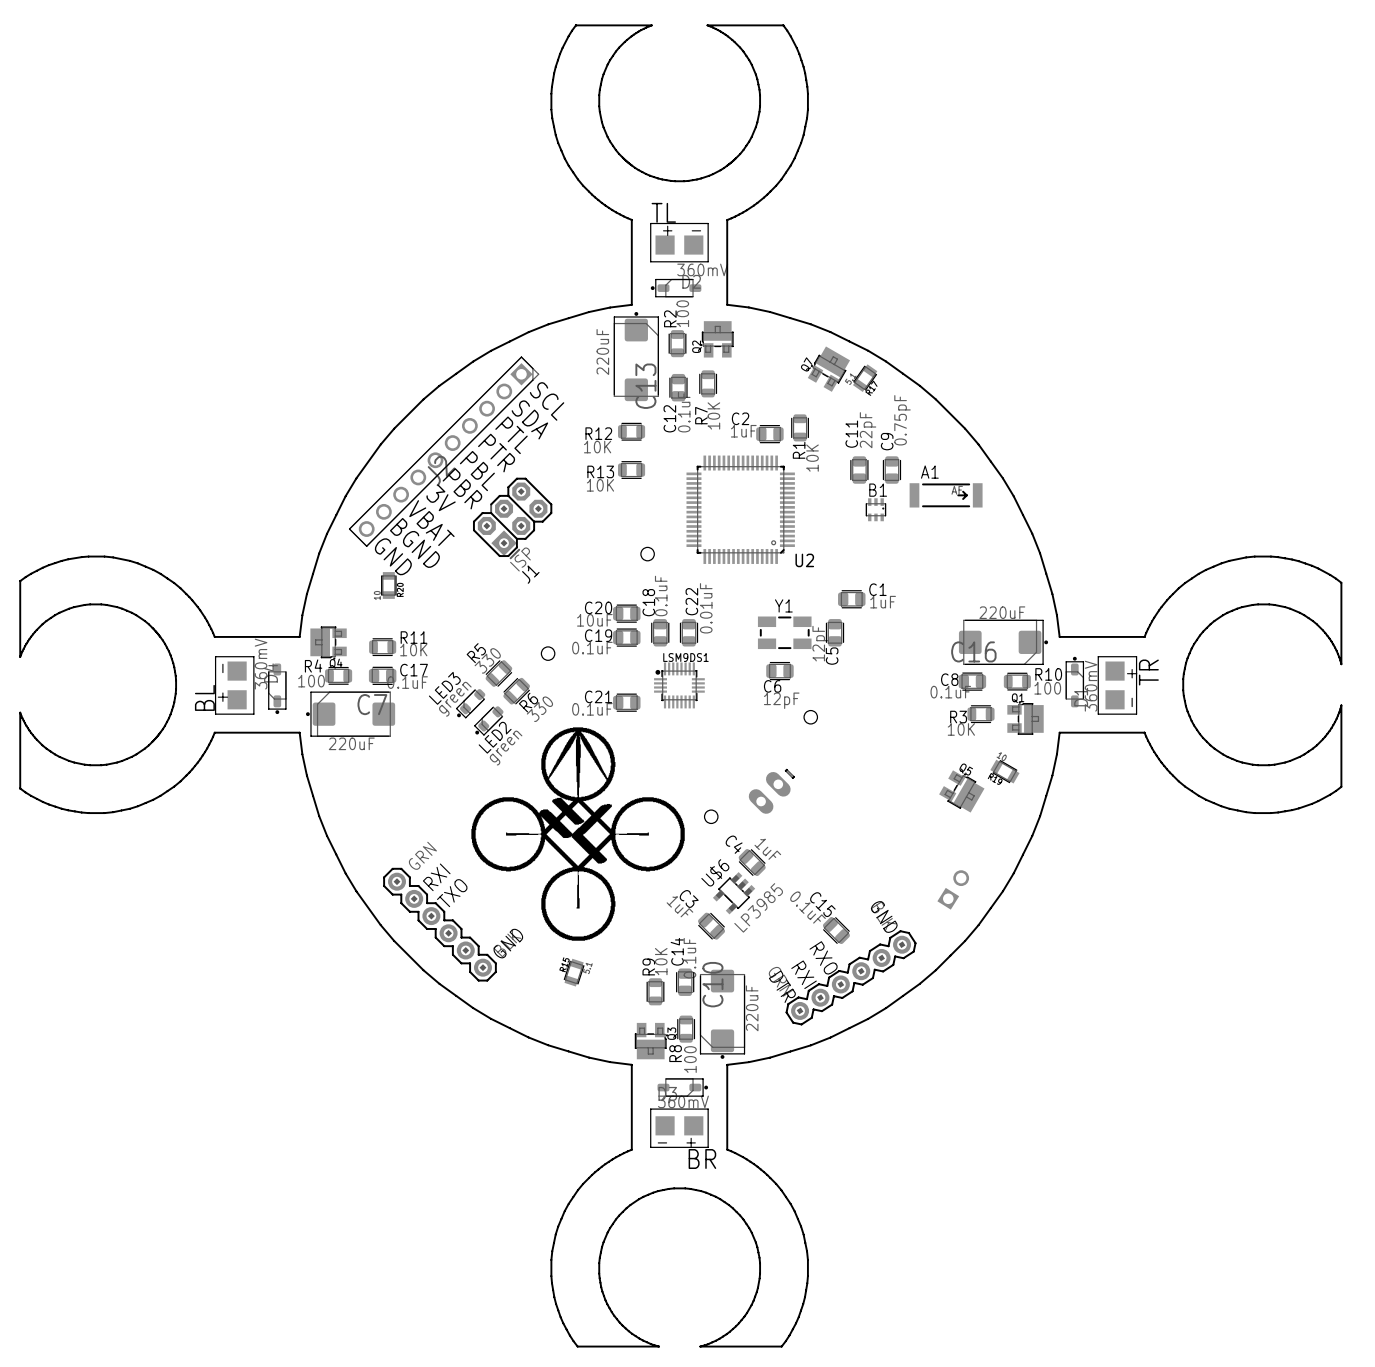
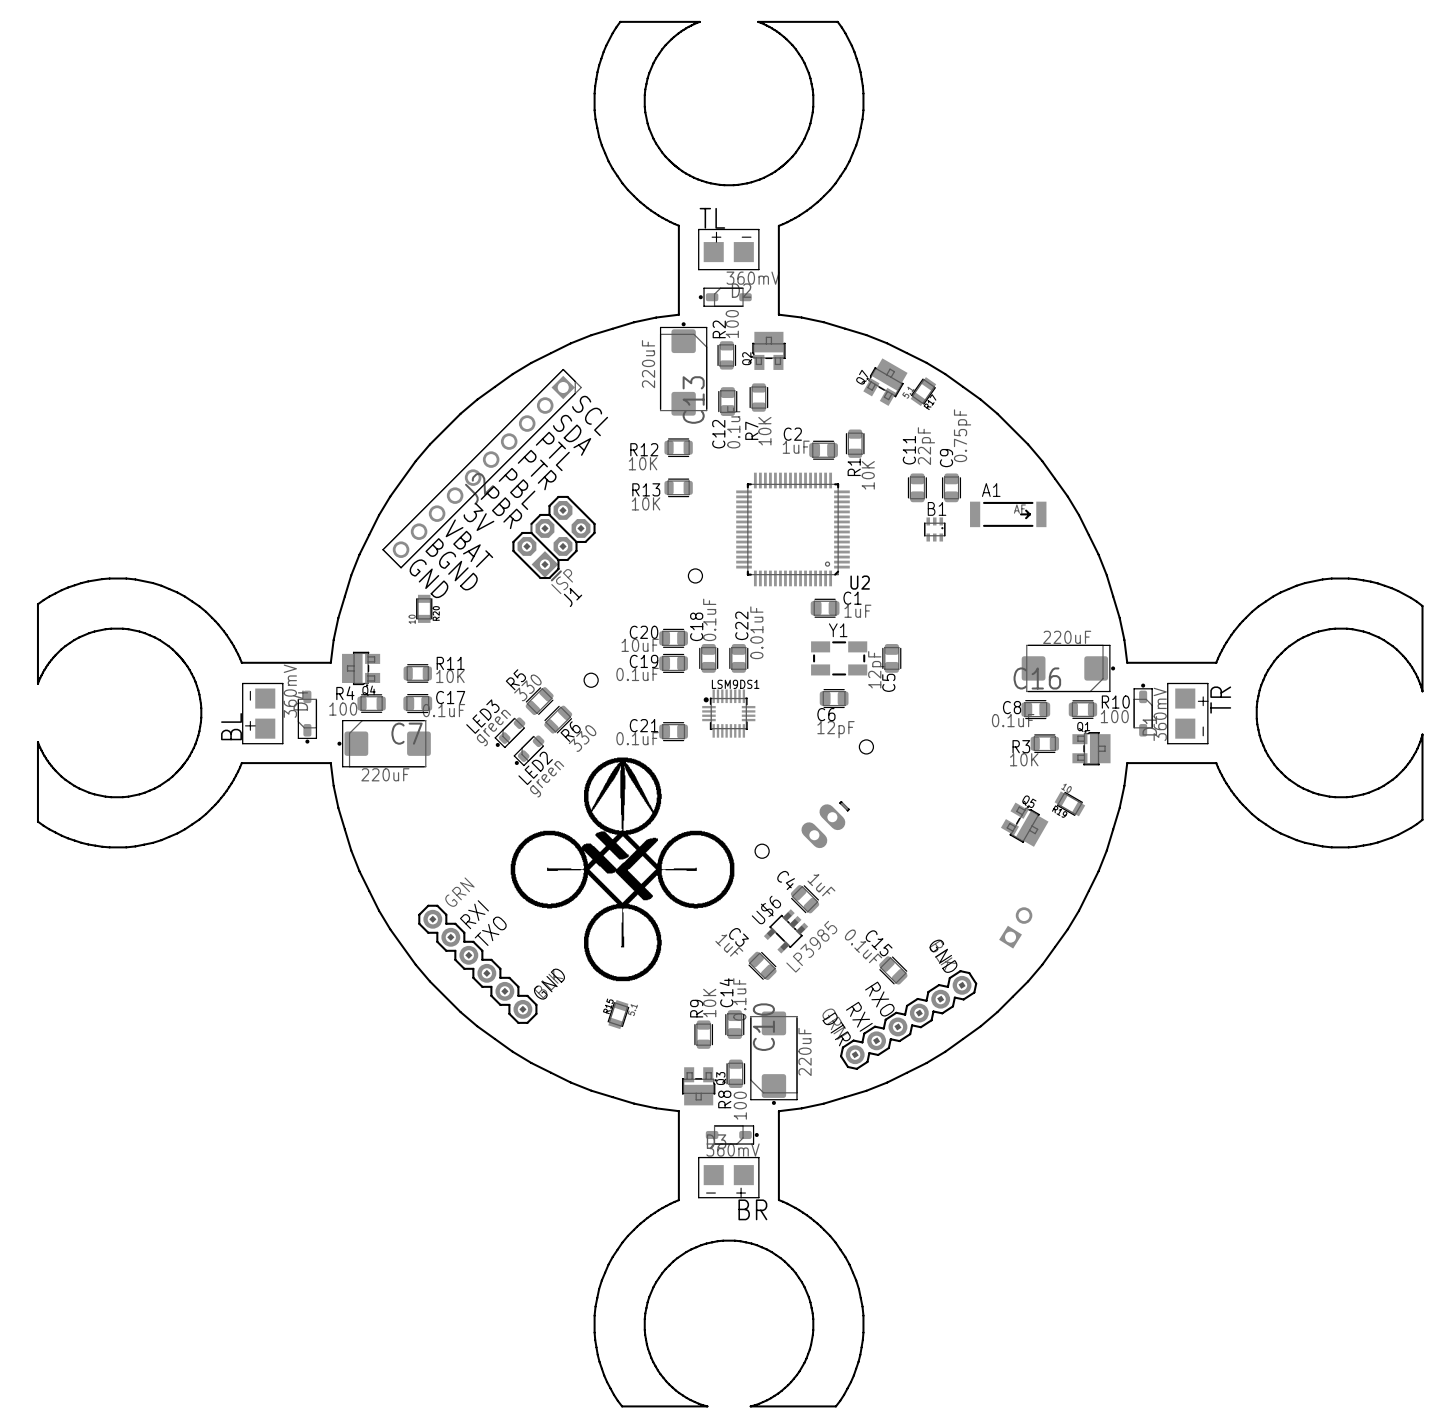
C1 position: (851, 599) -> (825, 608)

